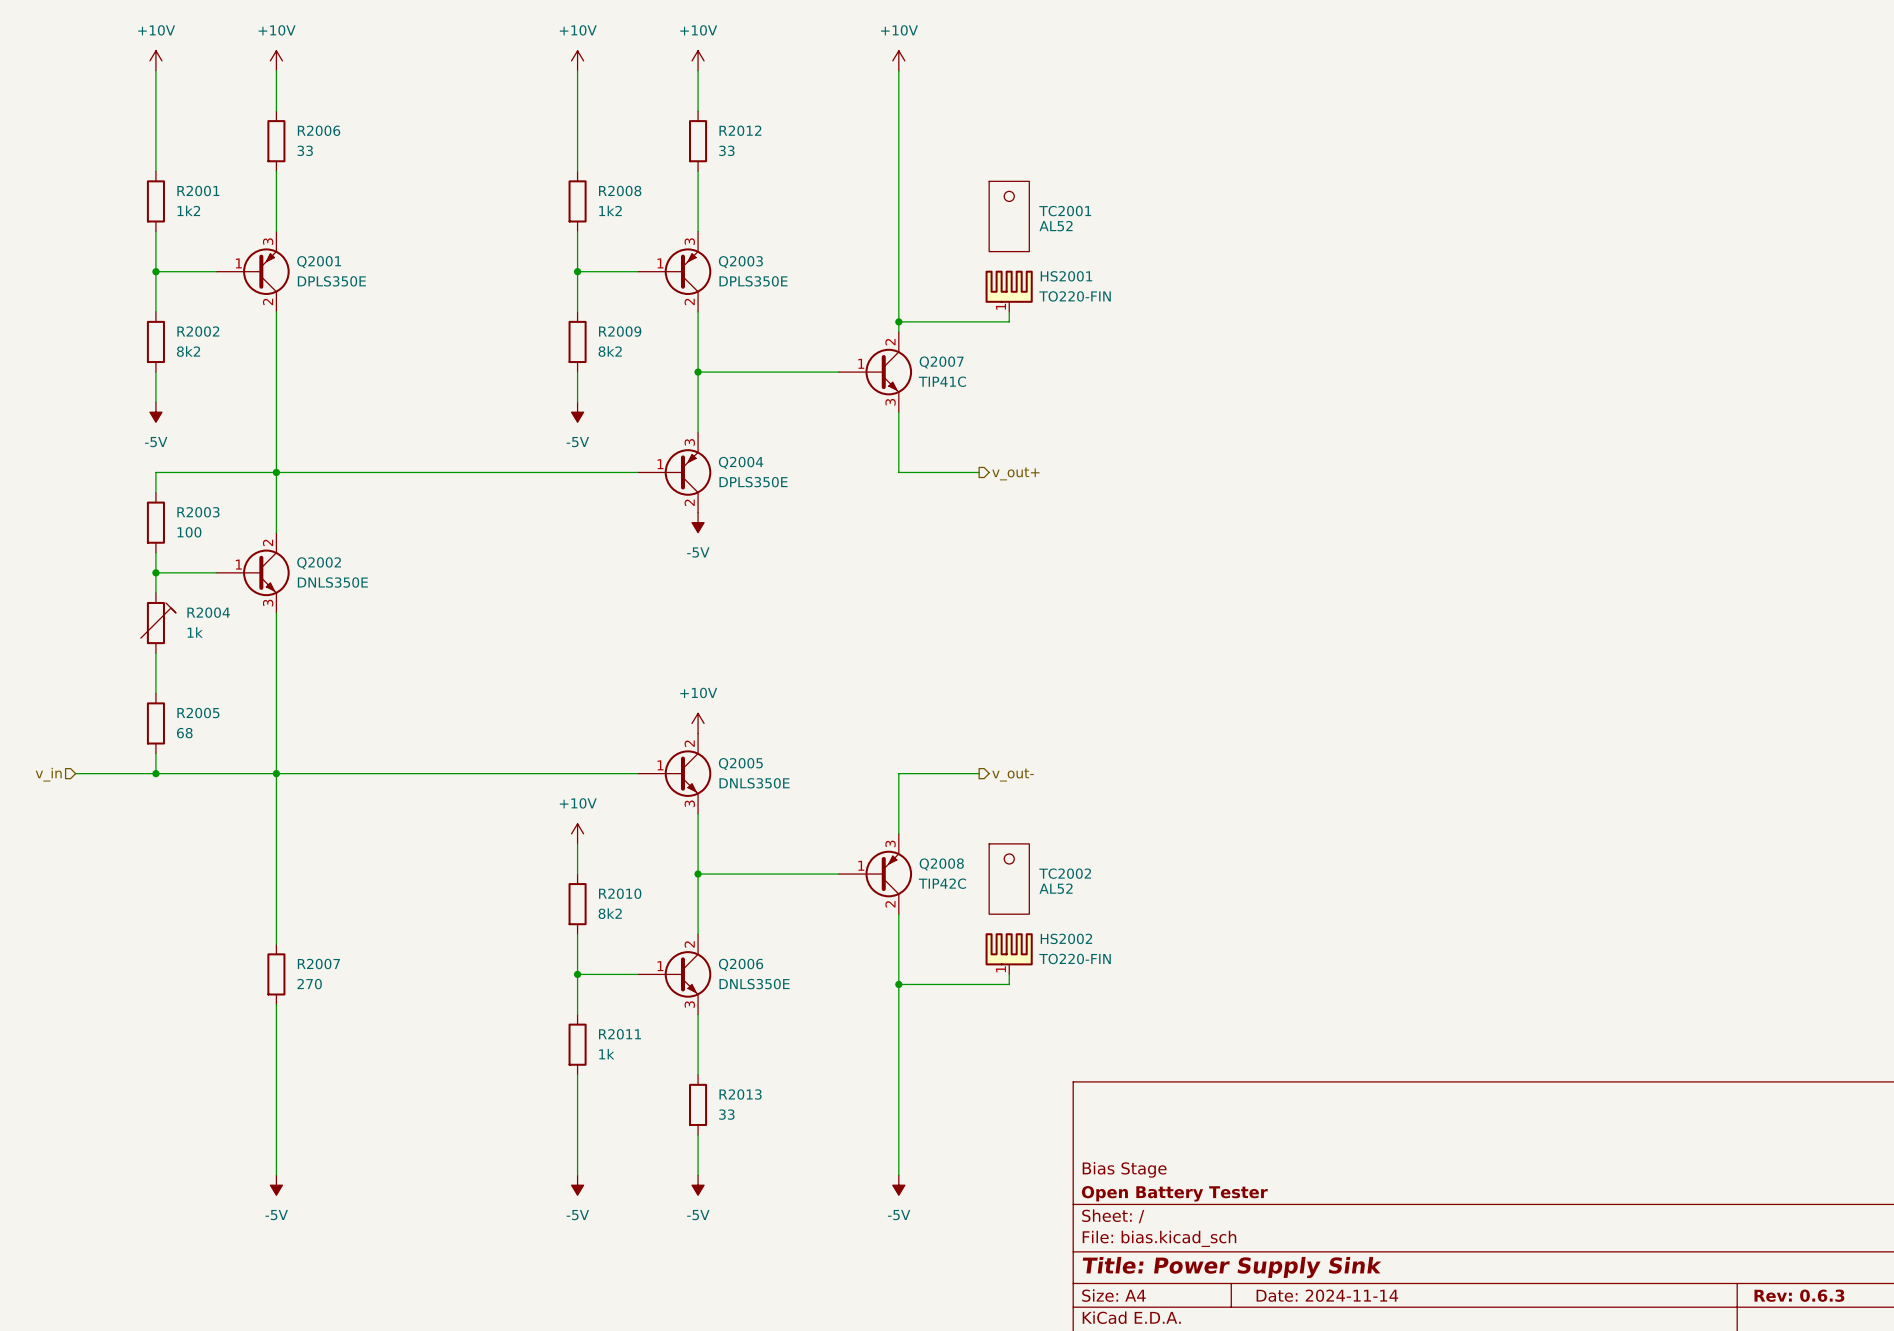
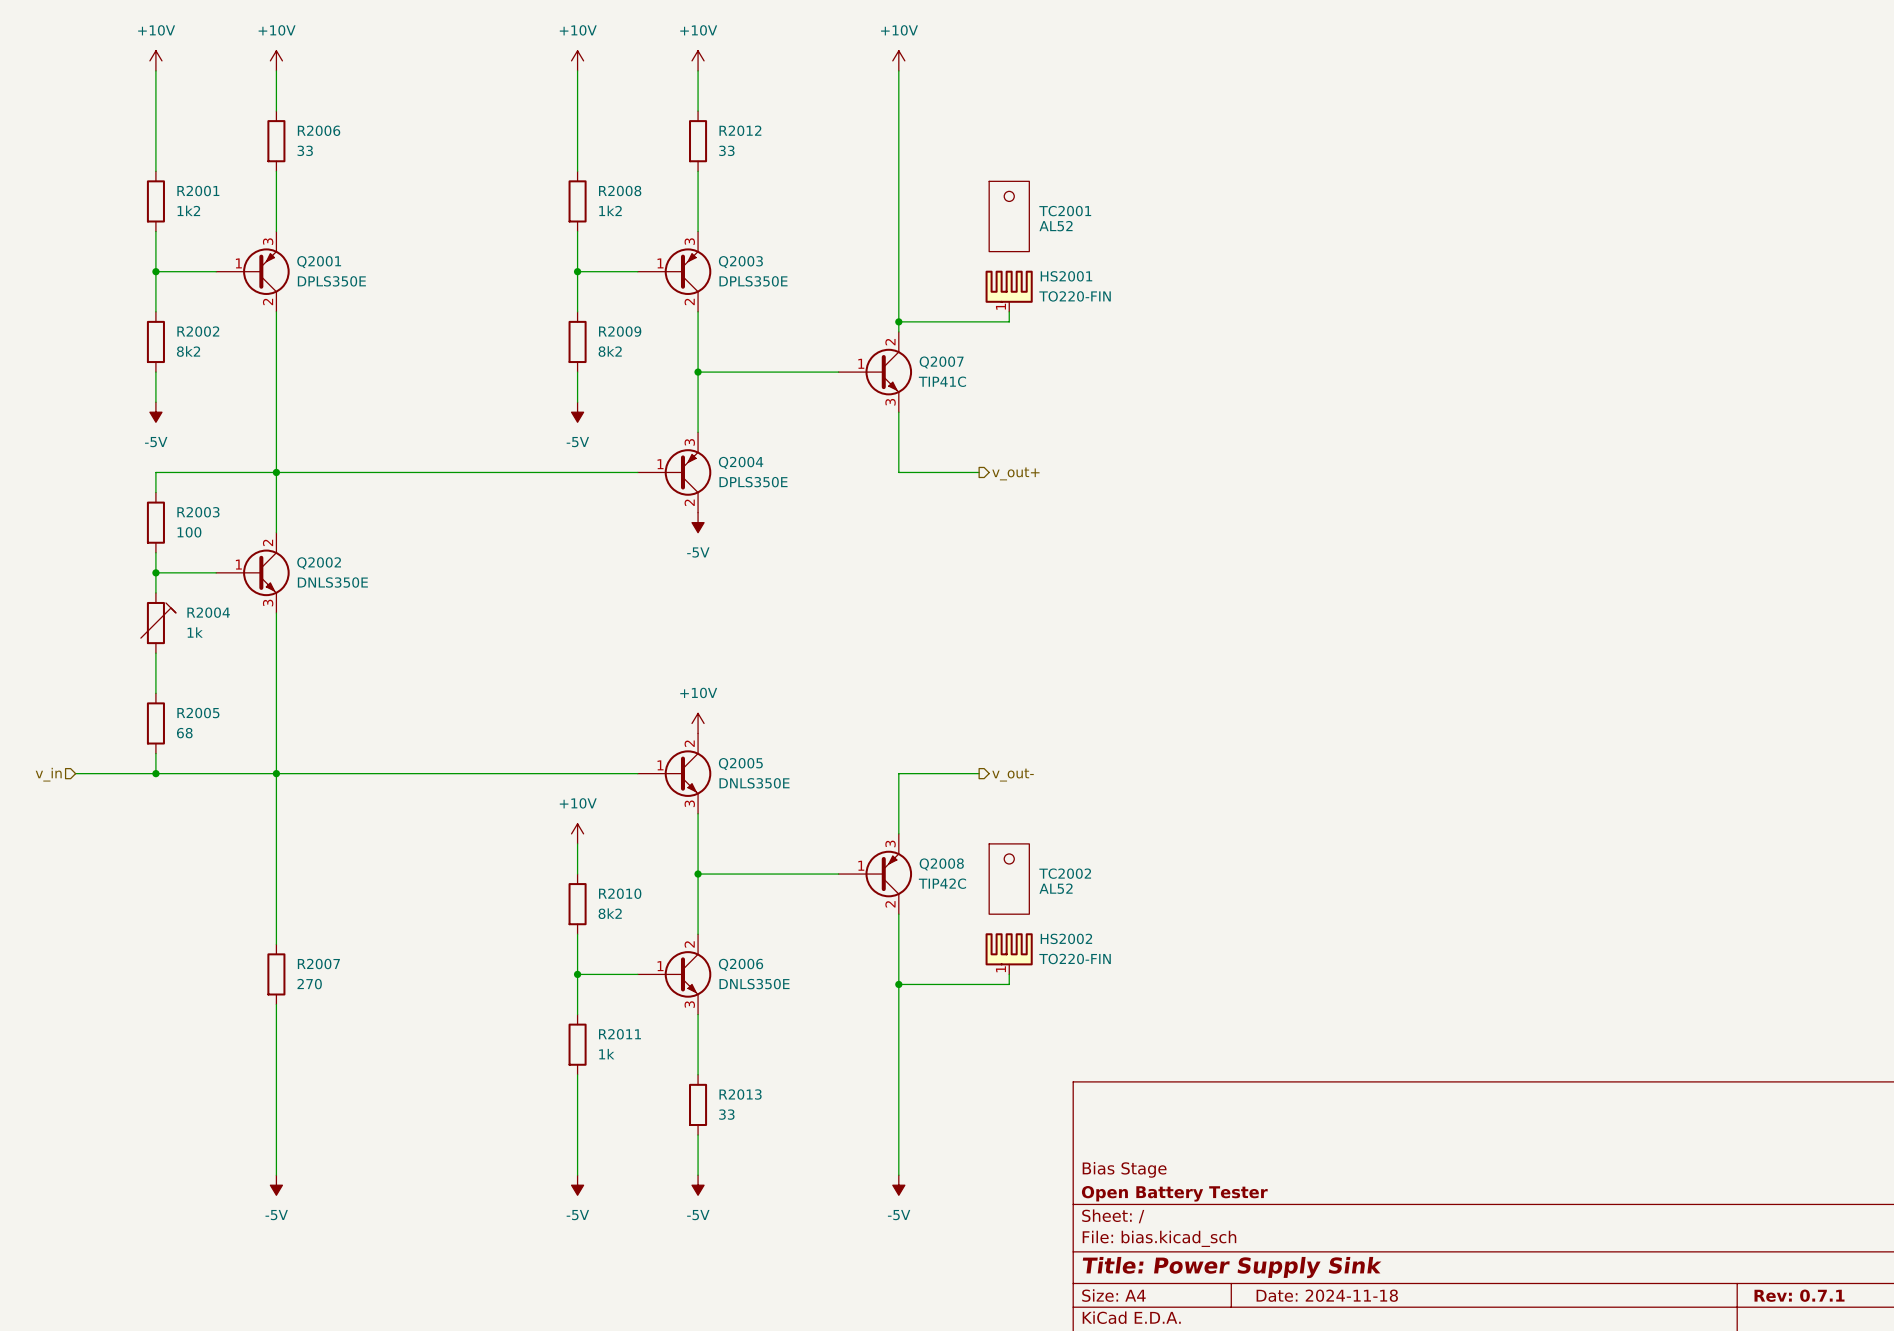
title block: Date: 2024-11-14 (1327, 1295) -> Date: 2024-11-18 (1327, 1295)
title block: Rev: 0.6.3 (1799, 1295) -> Rev: 0.7.1 (1799, 1295)

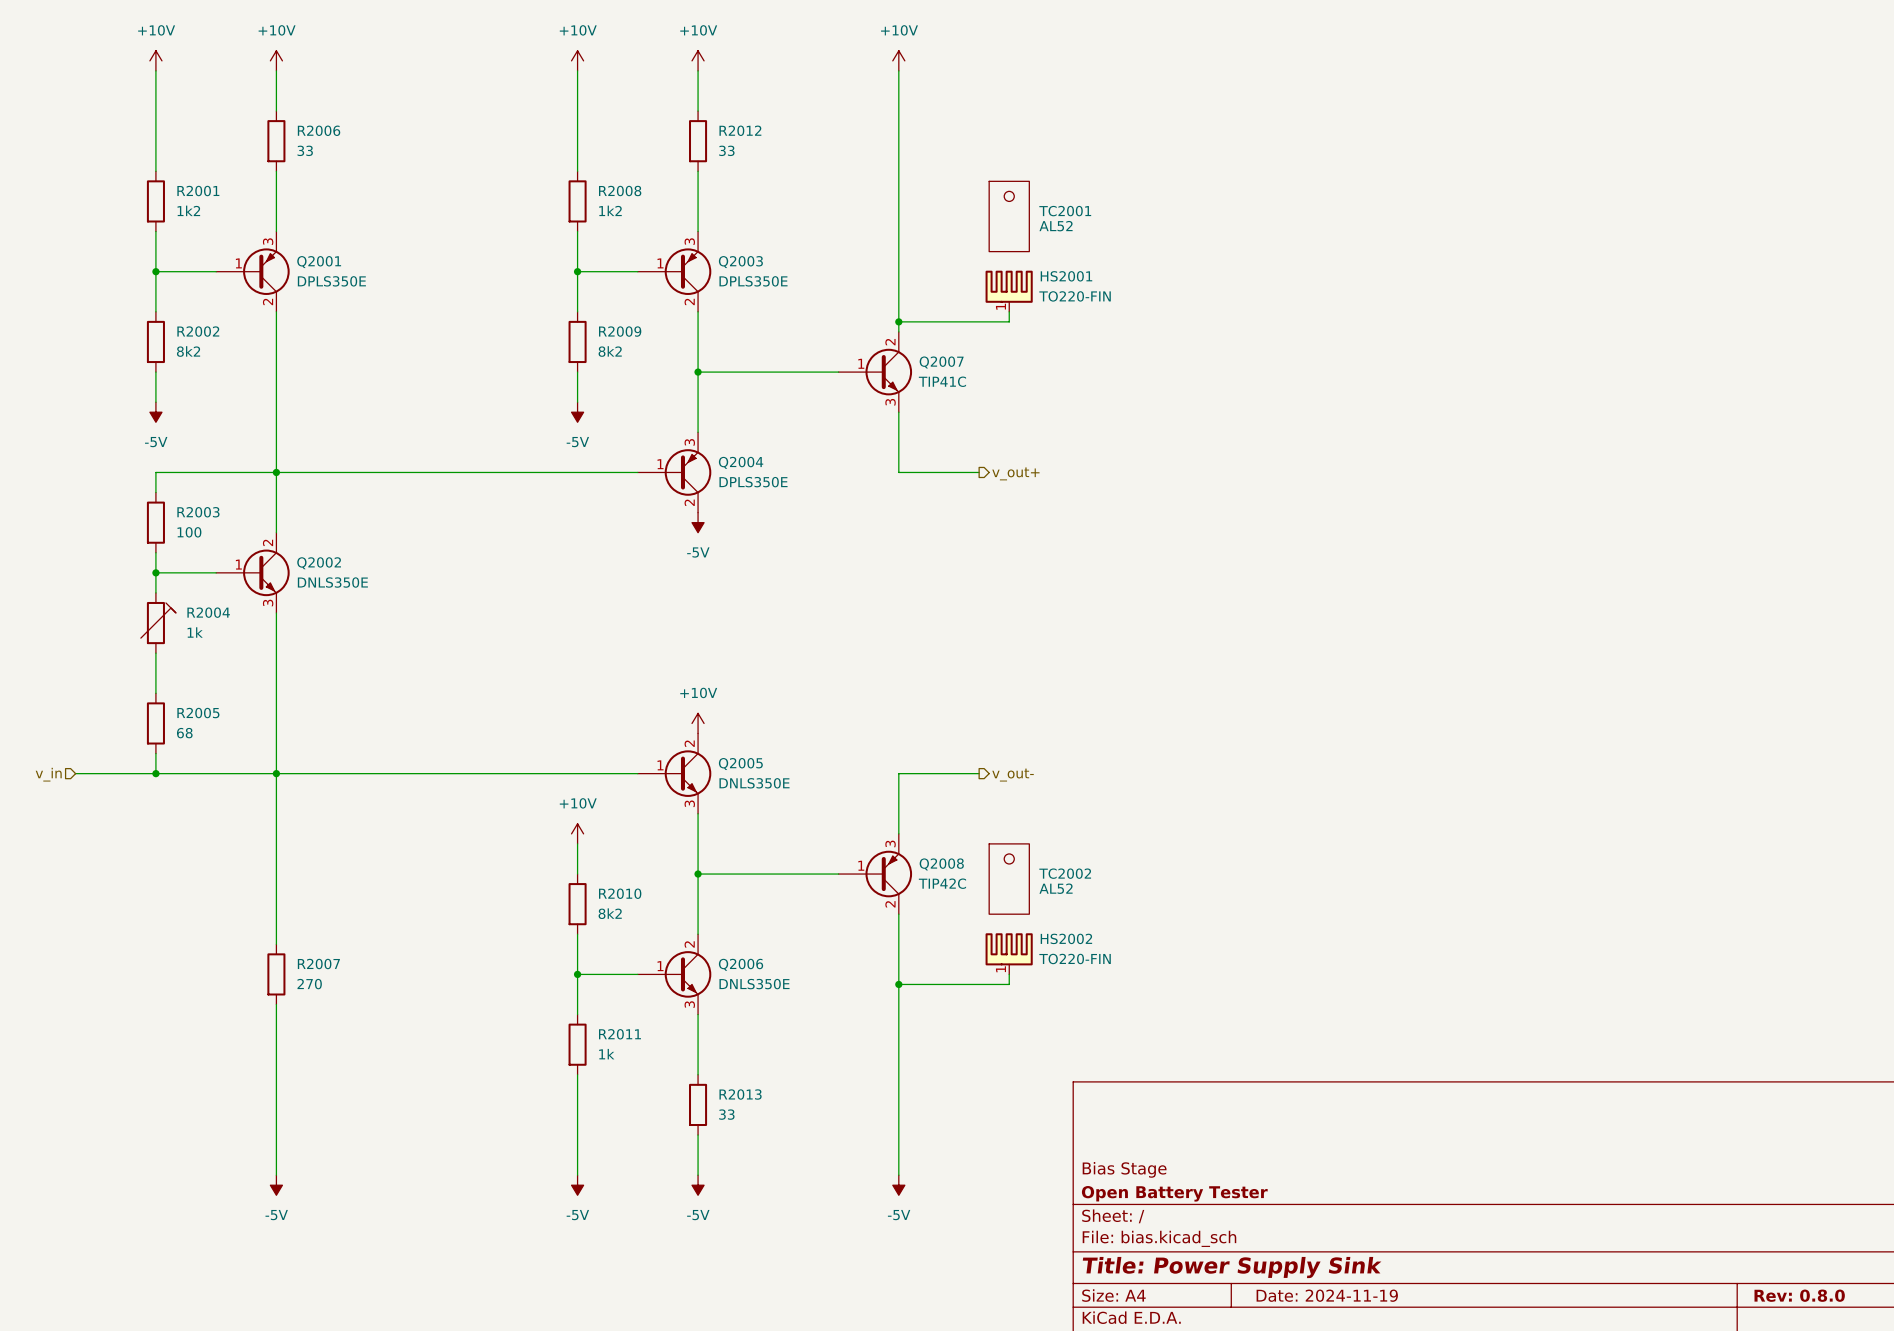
title block: Date: 2024-11-18 (1327, 1295) -> Date: 2024-11-19 (1327, 1295)
title block: Rev: 0.7.1 (1799, 1295) -> Rev: 0.8.0 (1799, 1295)

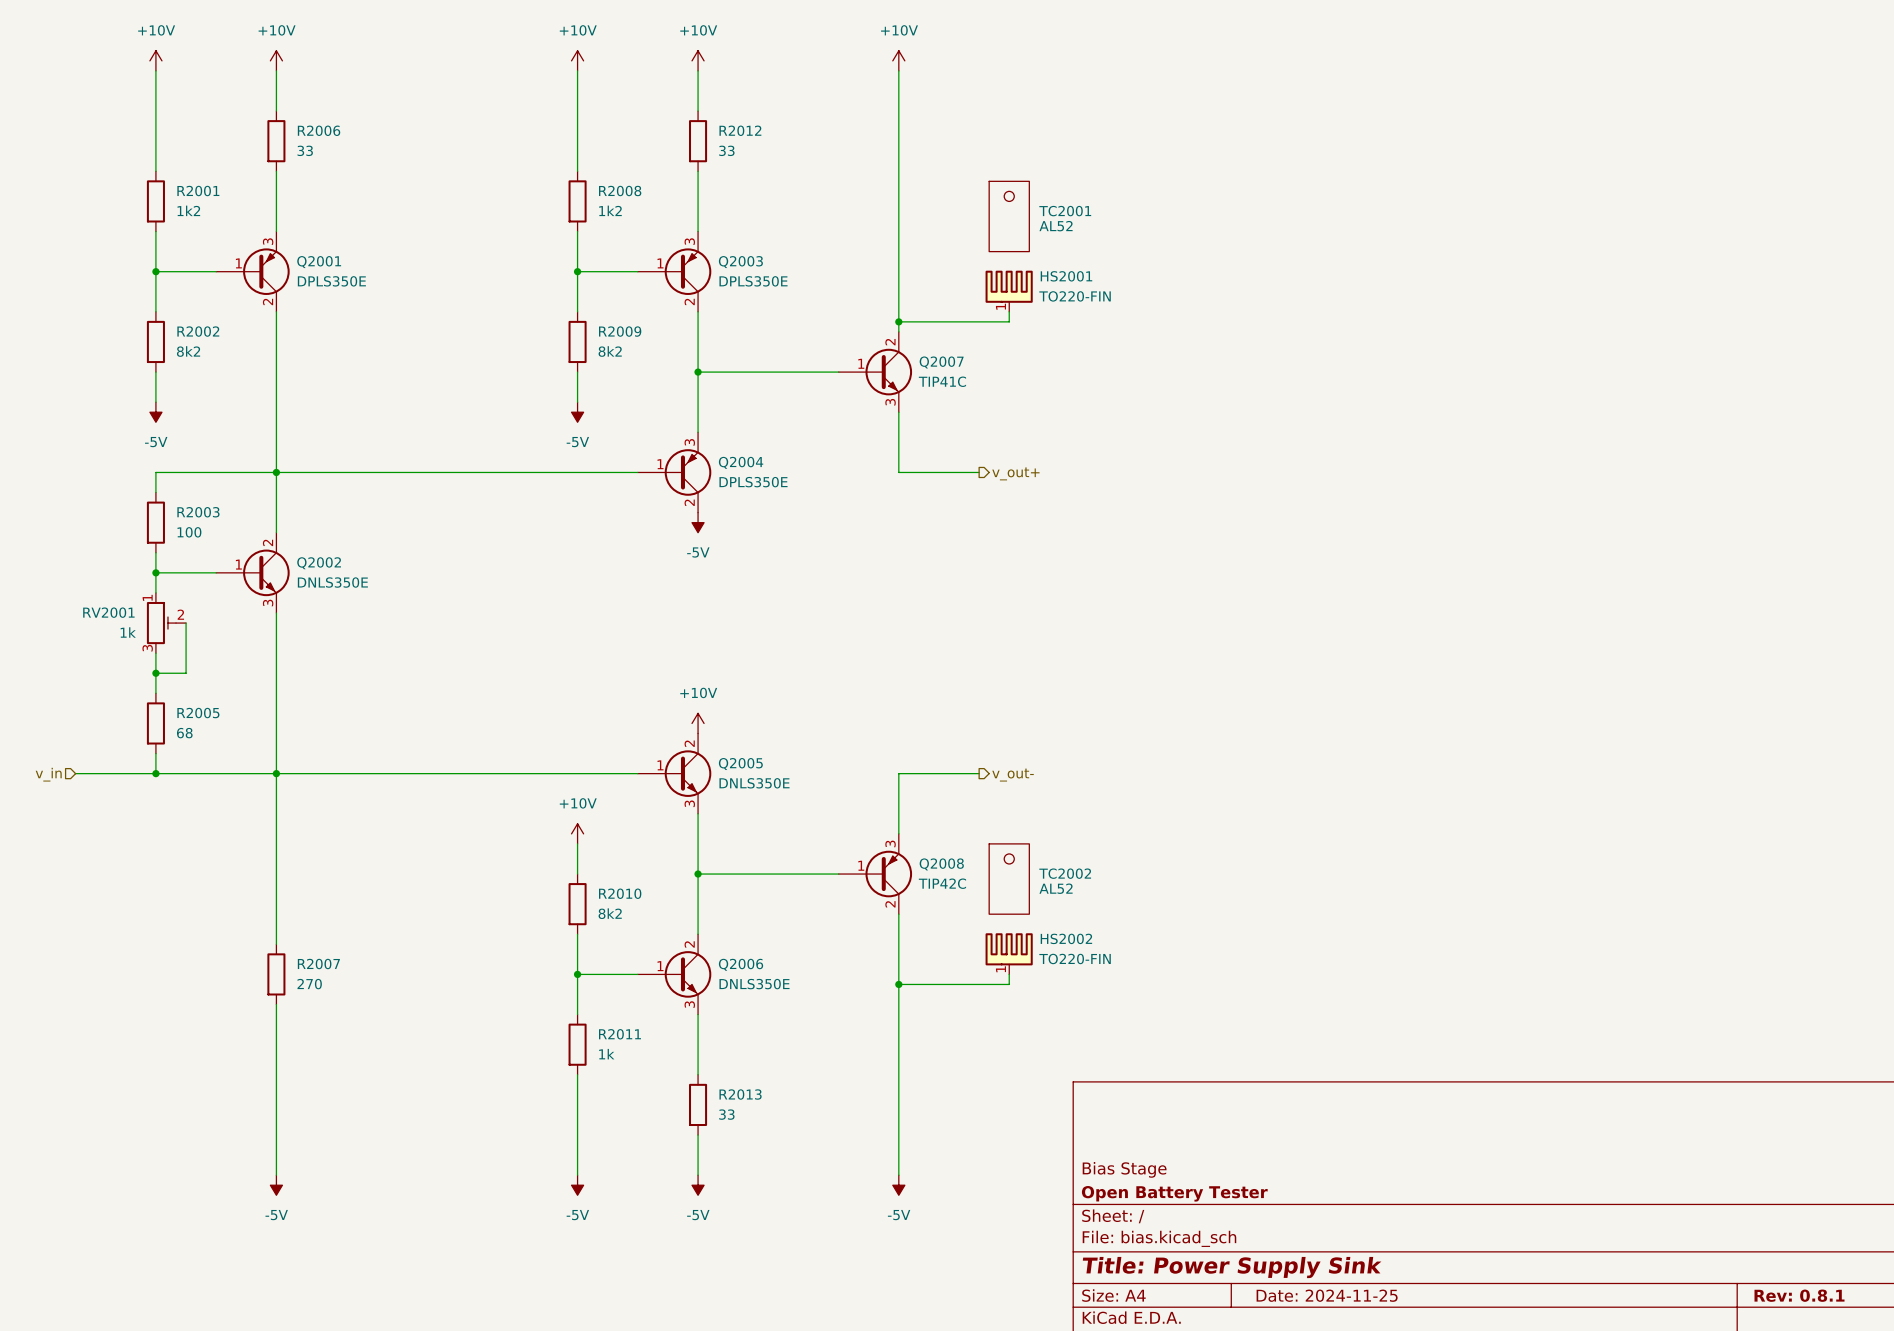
R2004: 1k (158, 623) -> none
RV2001: none -> 1k (166, 623)
wire: none -> (186, 623) (186, 673) (155, 673)
junction: none -> (155, 673)
title block: Date: 2024-11-19 (1327, 1295) -> Date: 2024-11-25 (1327, 1295)
title block: Rev: 0.8.0 (1799, 1295) -> Rev: 0.8.1 (1799, 1295)

